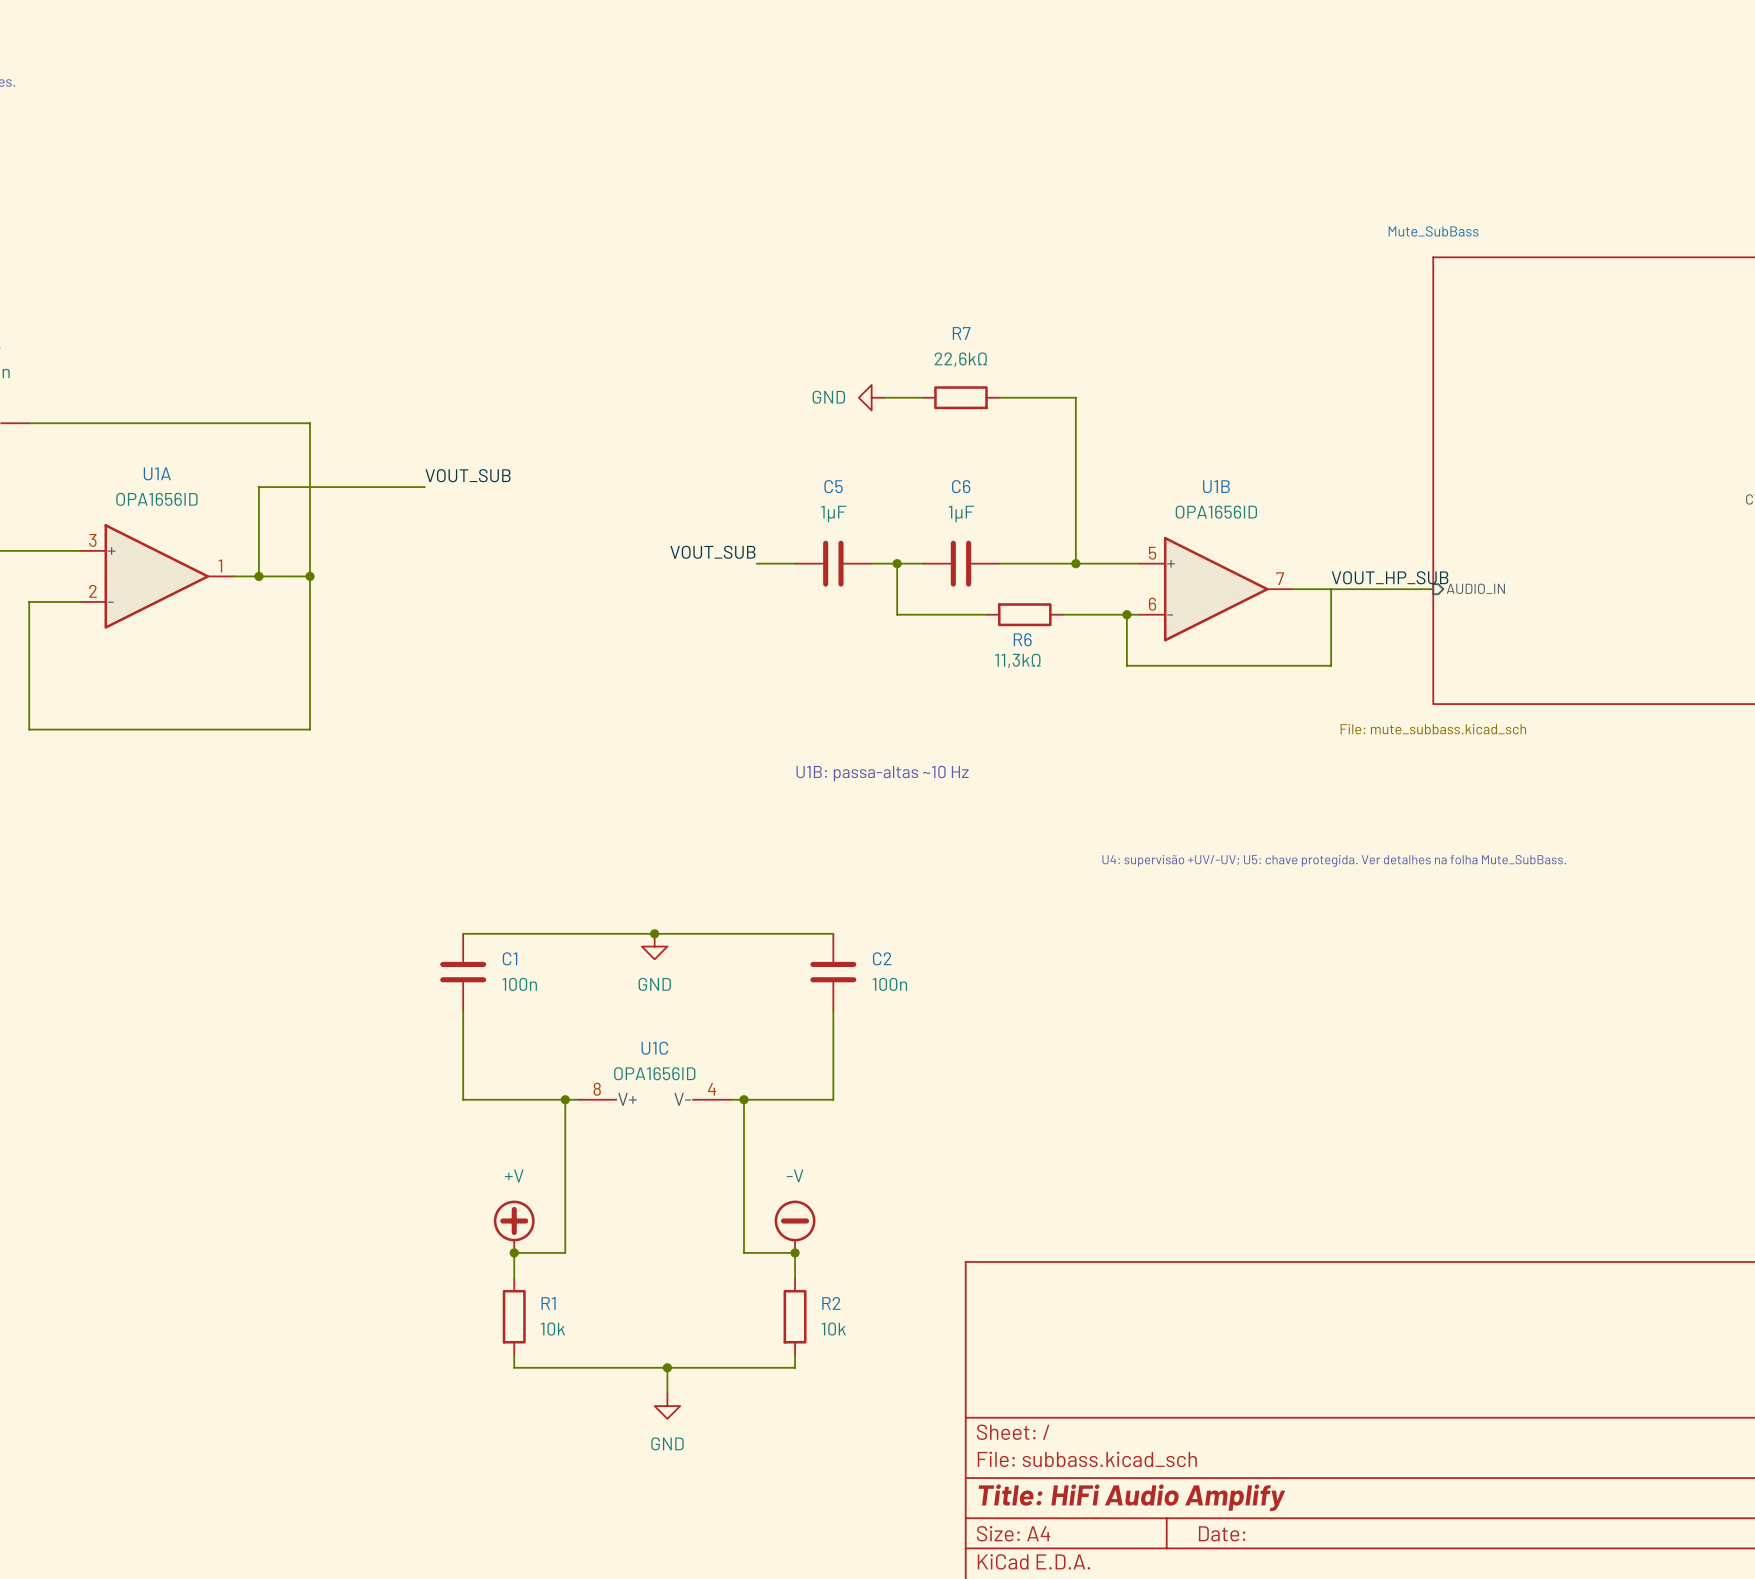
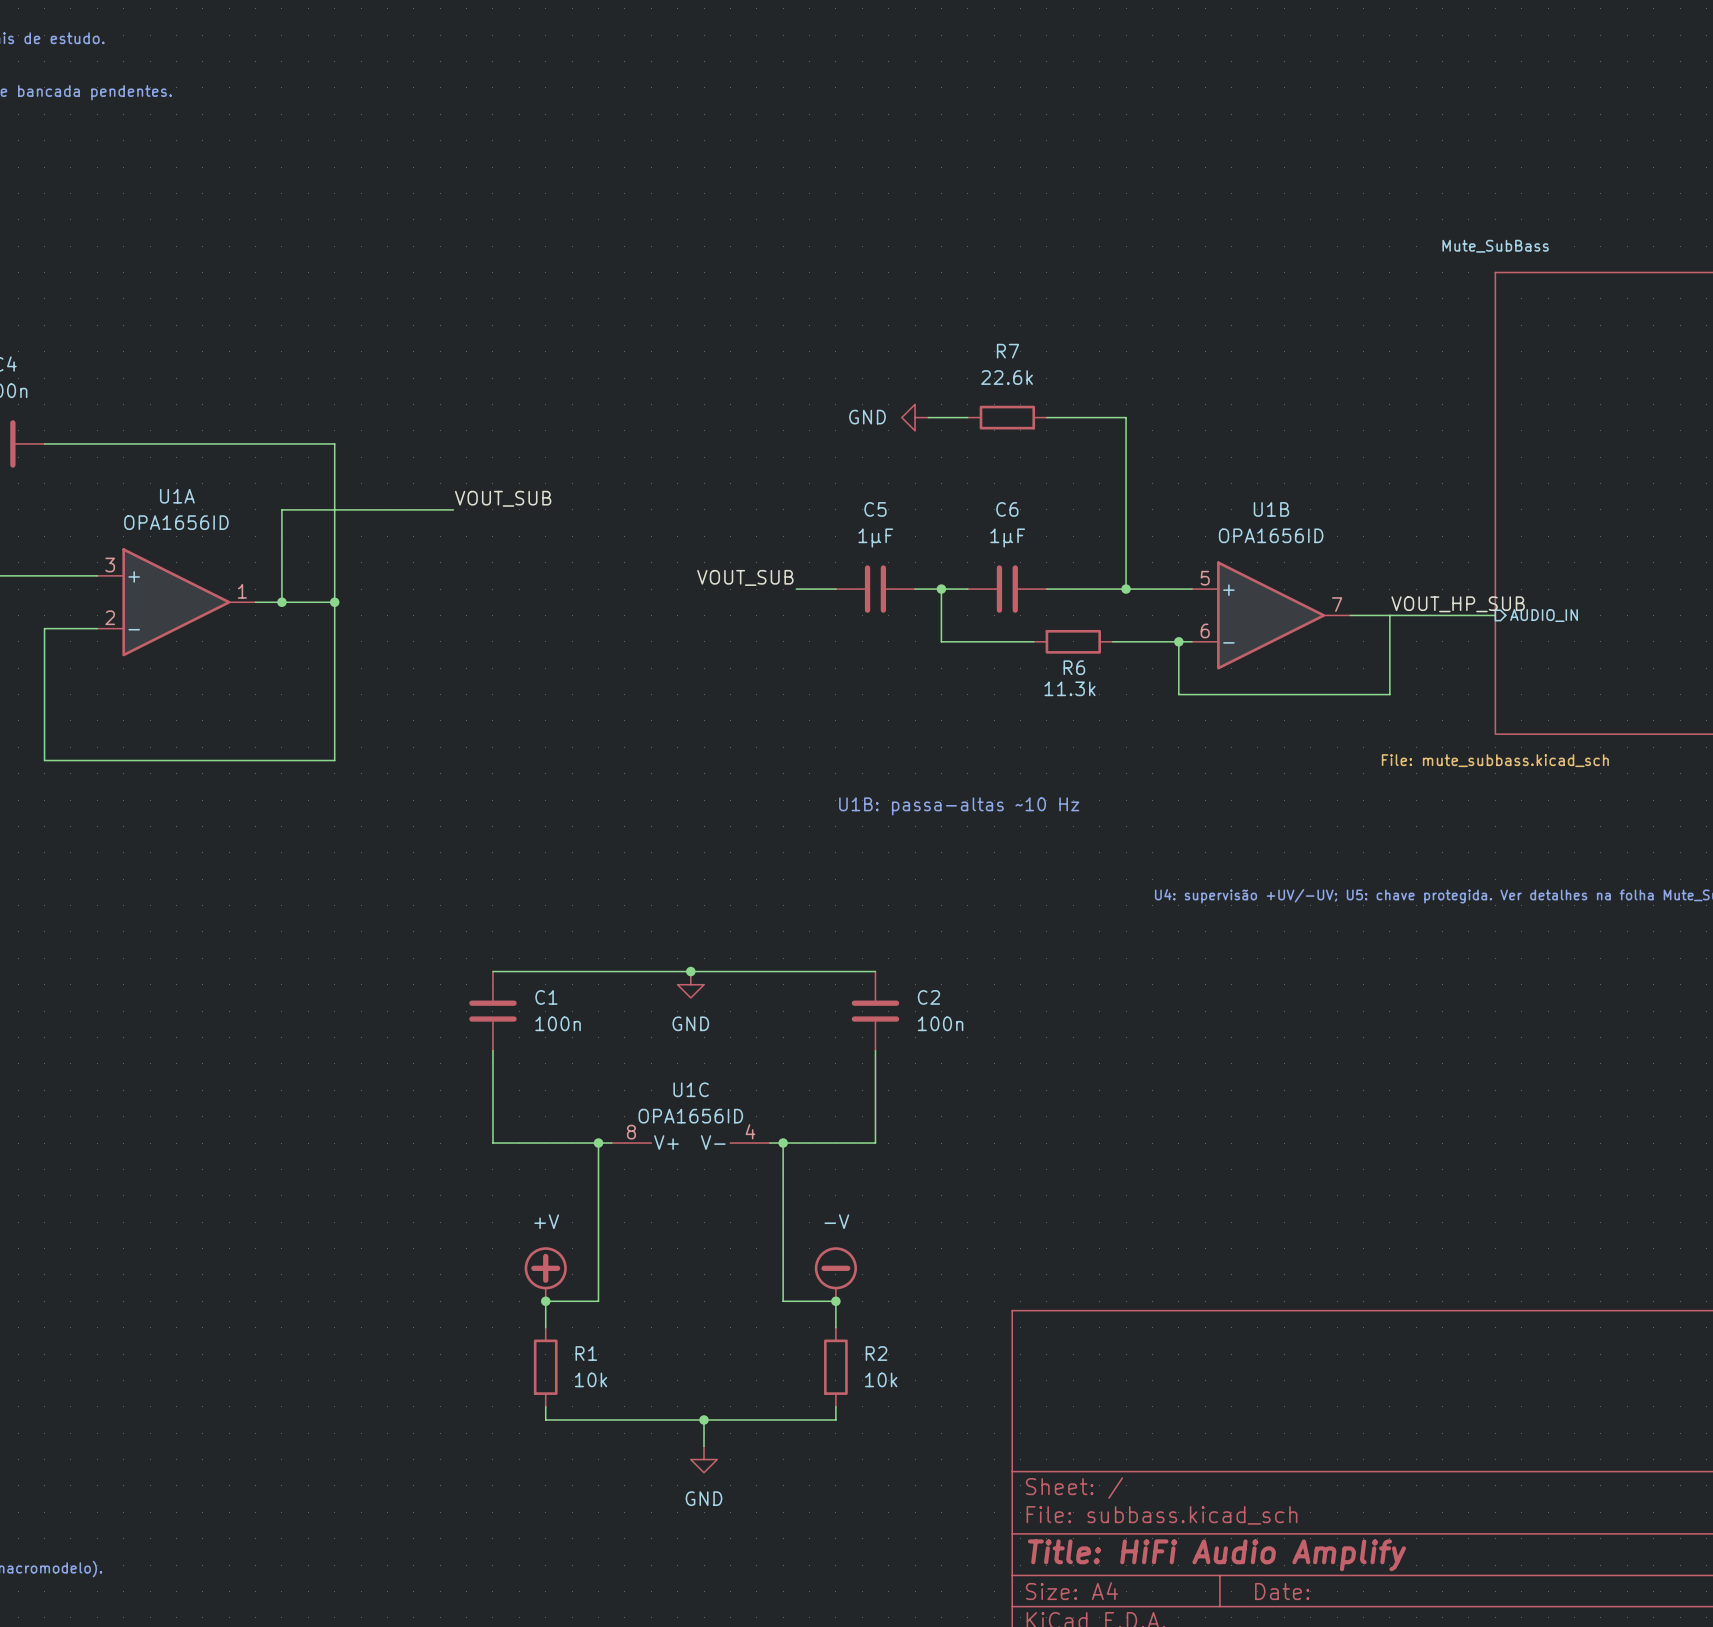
R7 value: 22,6kΩ (960, 359) -> 22.6k (1007, 377)
R6 value: 11,3kΩ (1017, 660) -> 11.3k (1070, 688)

